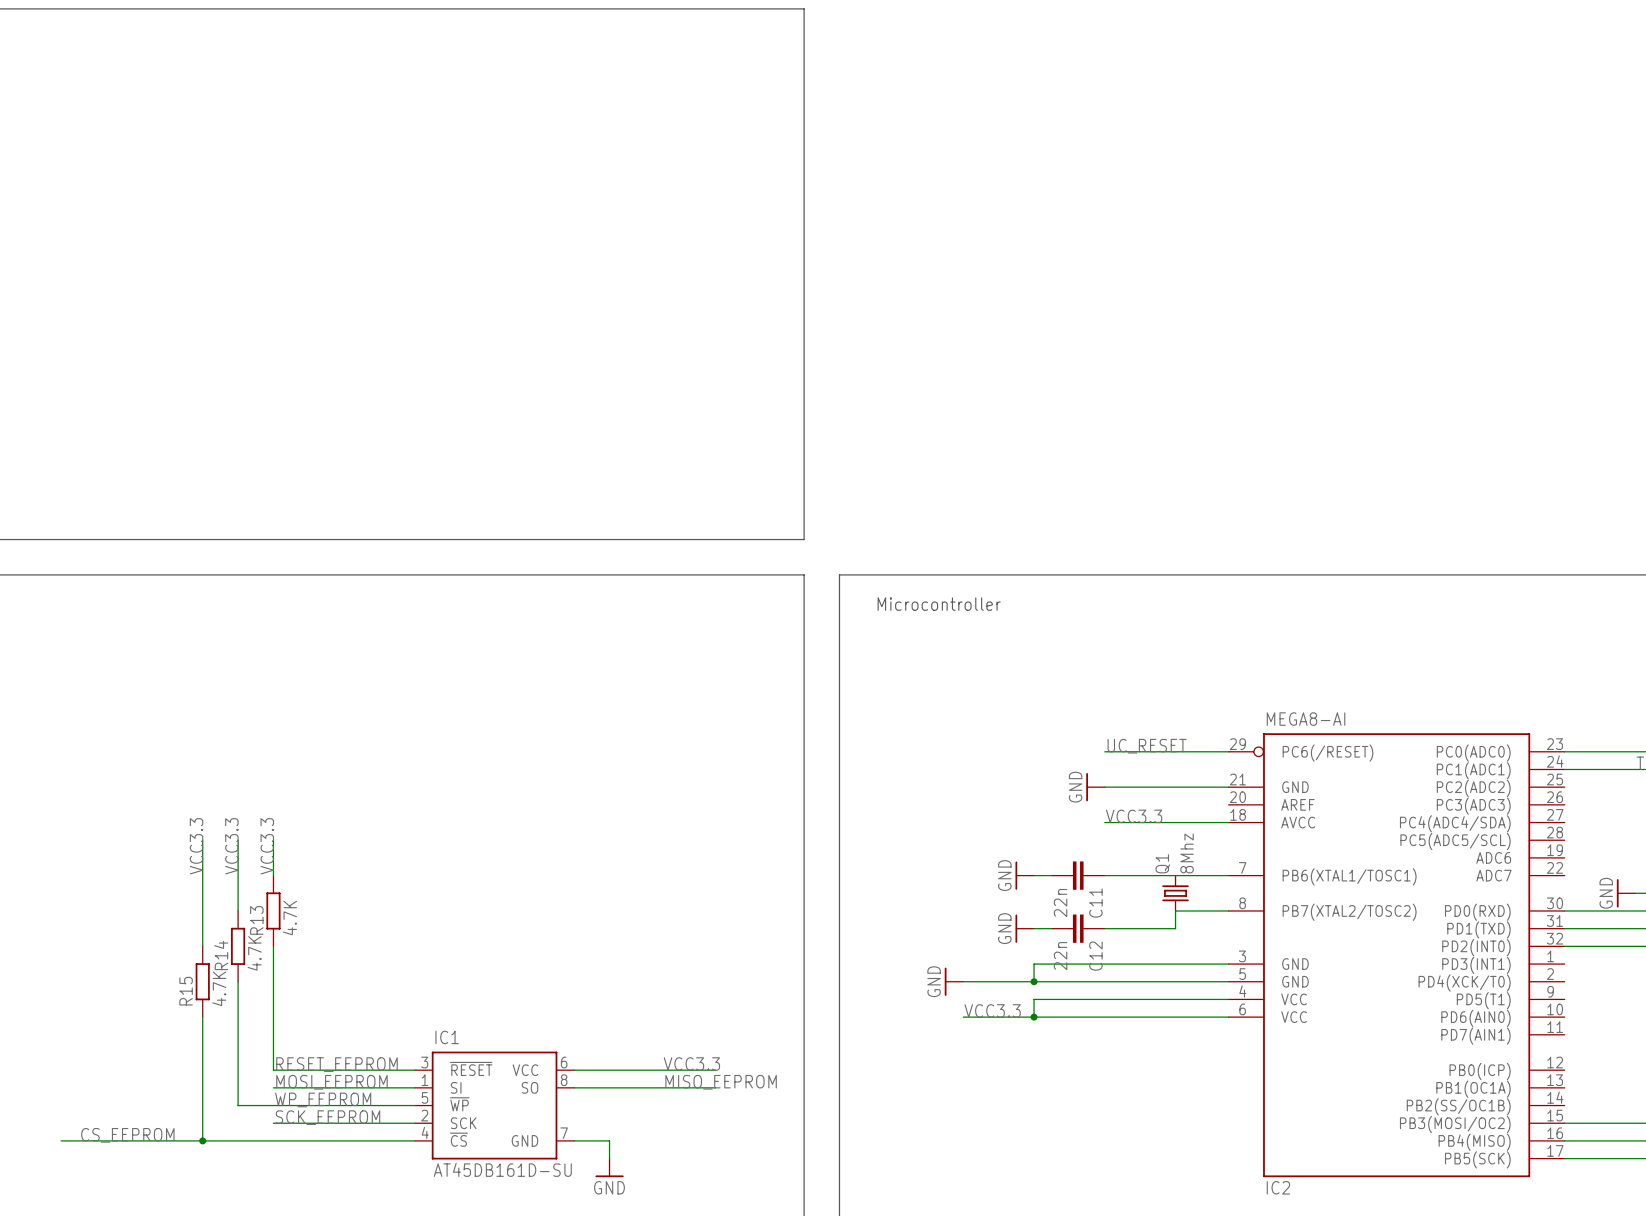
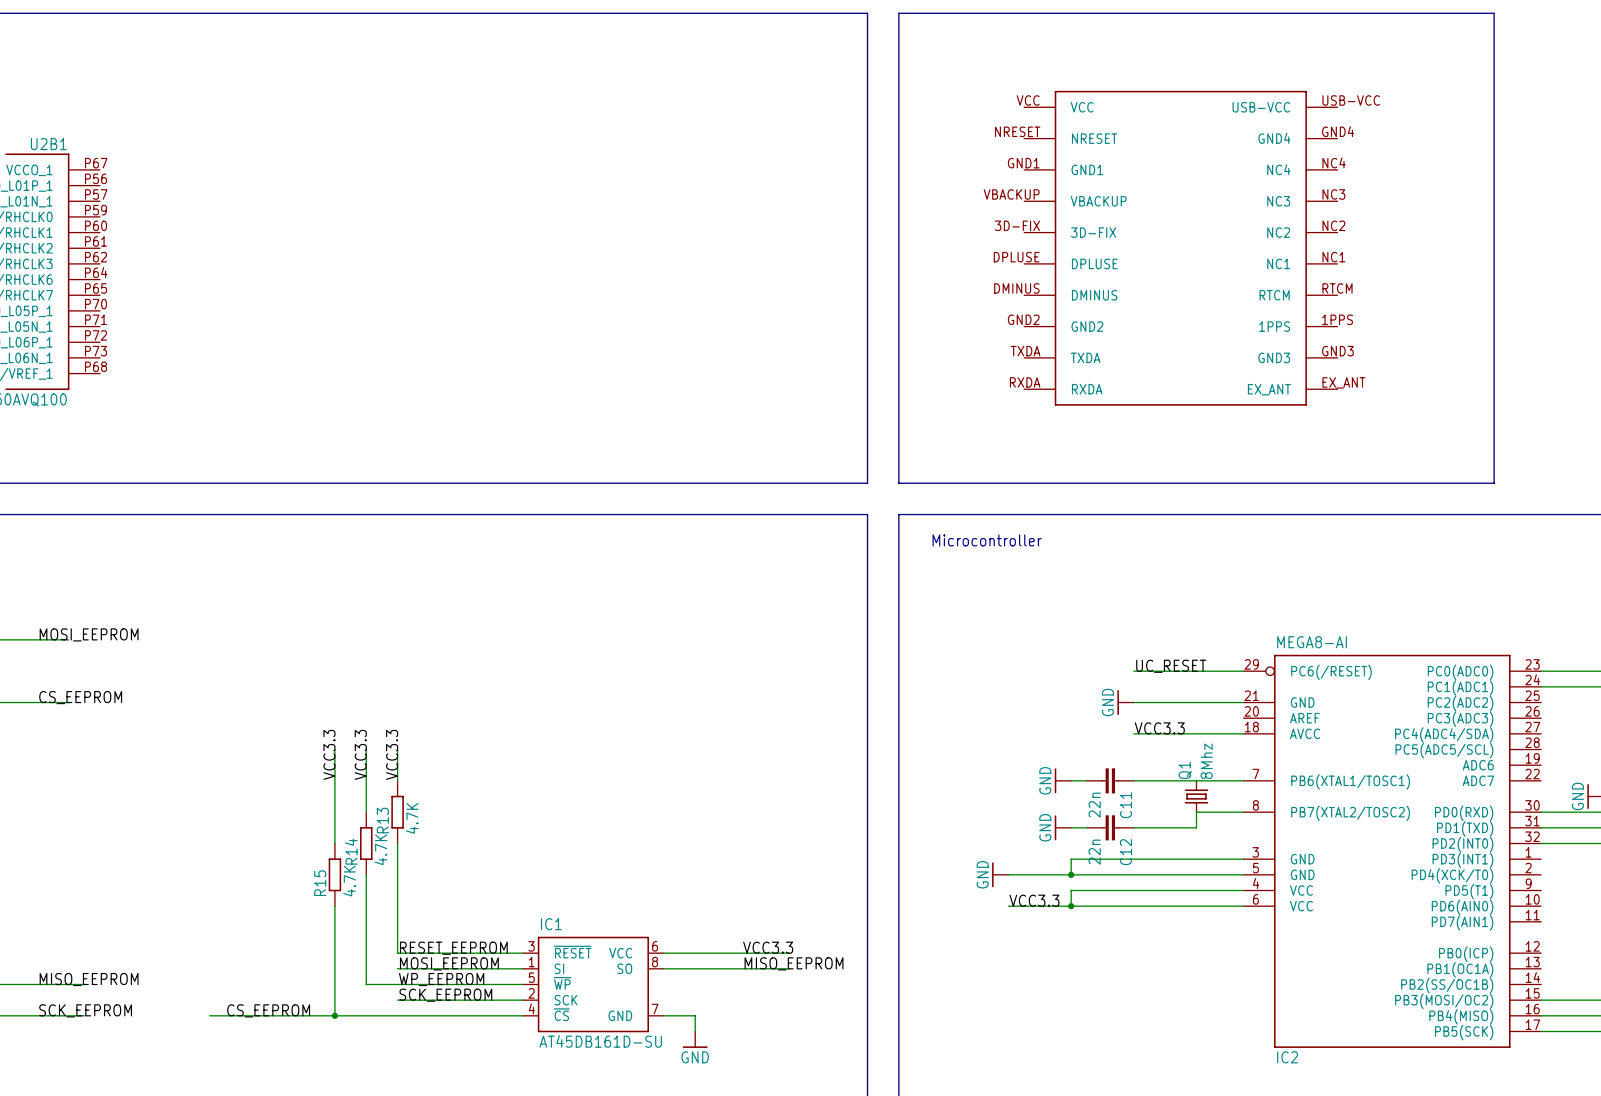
line: none -> (898, 13) (898, 483) (1494, 483) (1494, 13) (898, 13)
part: none -> (1180, 248)

